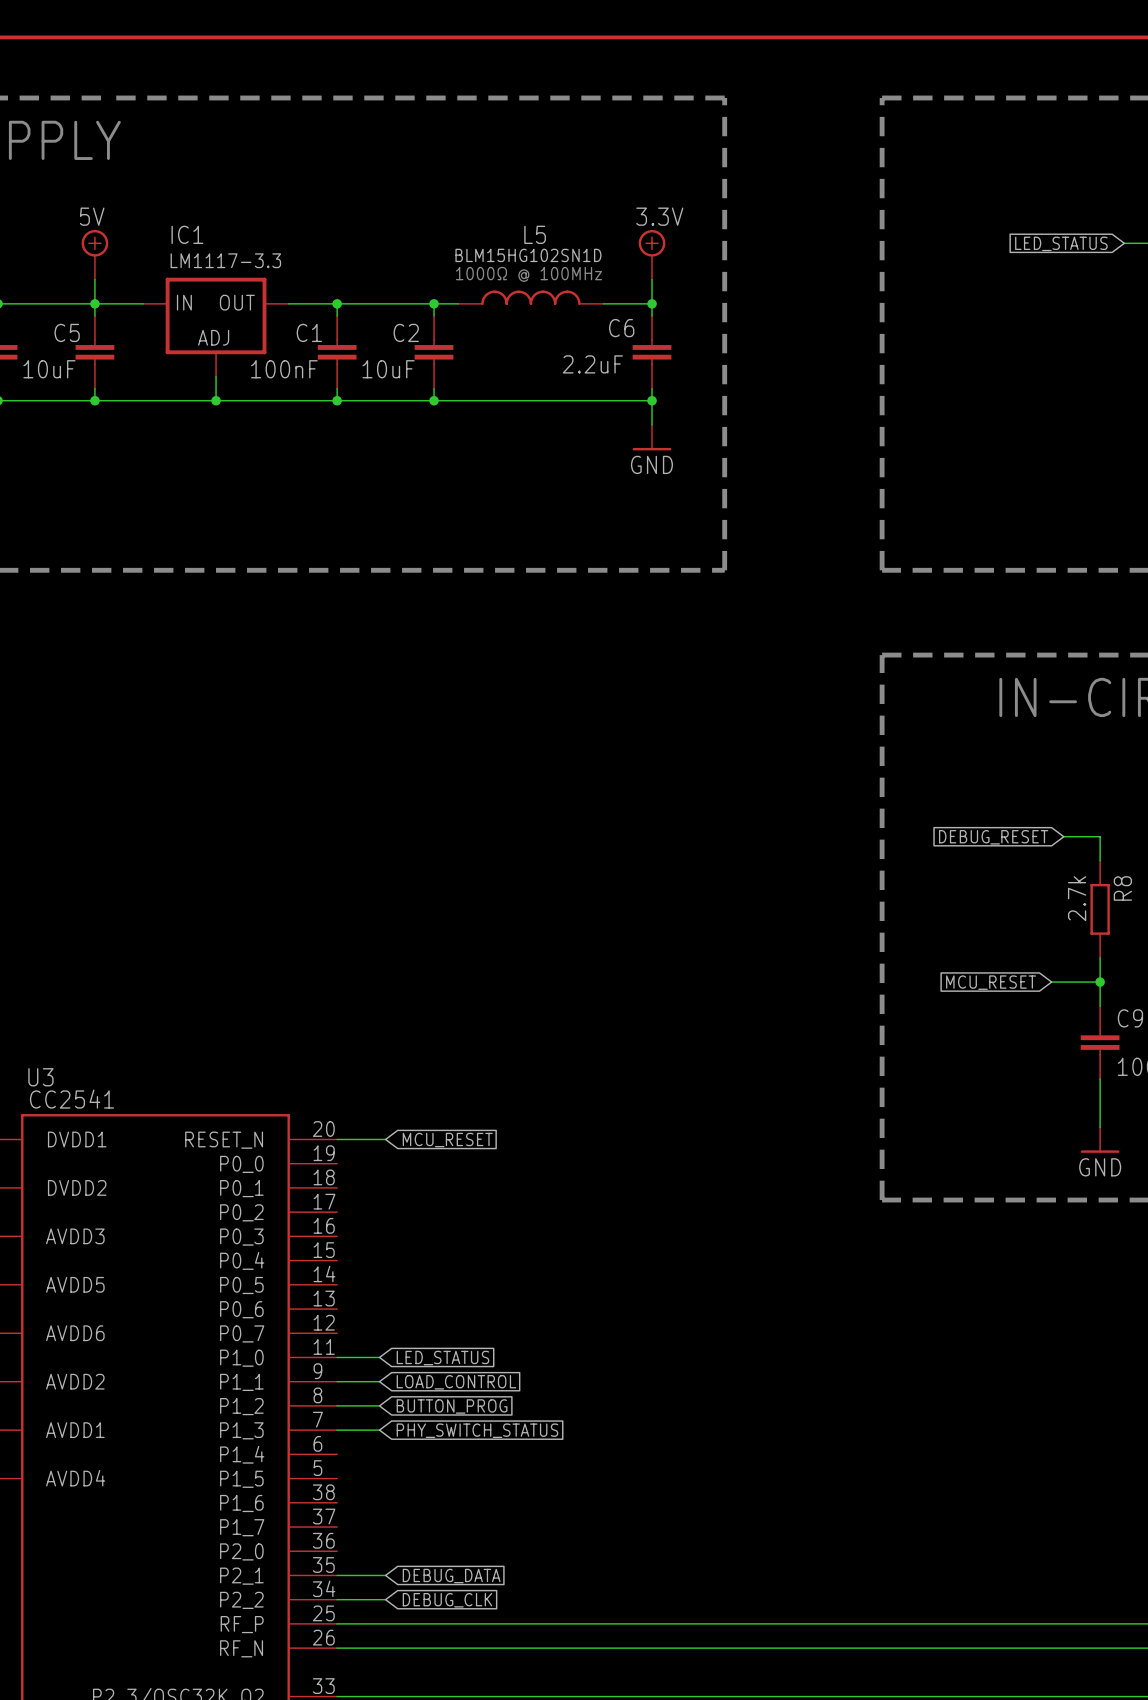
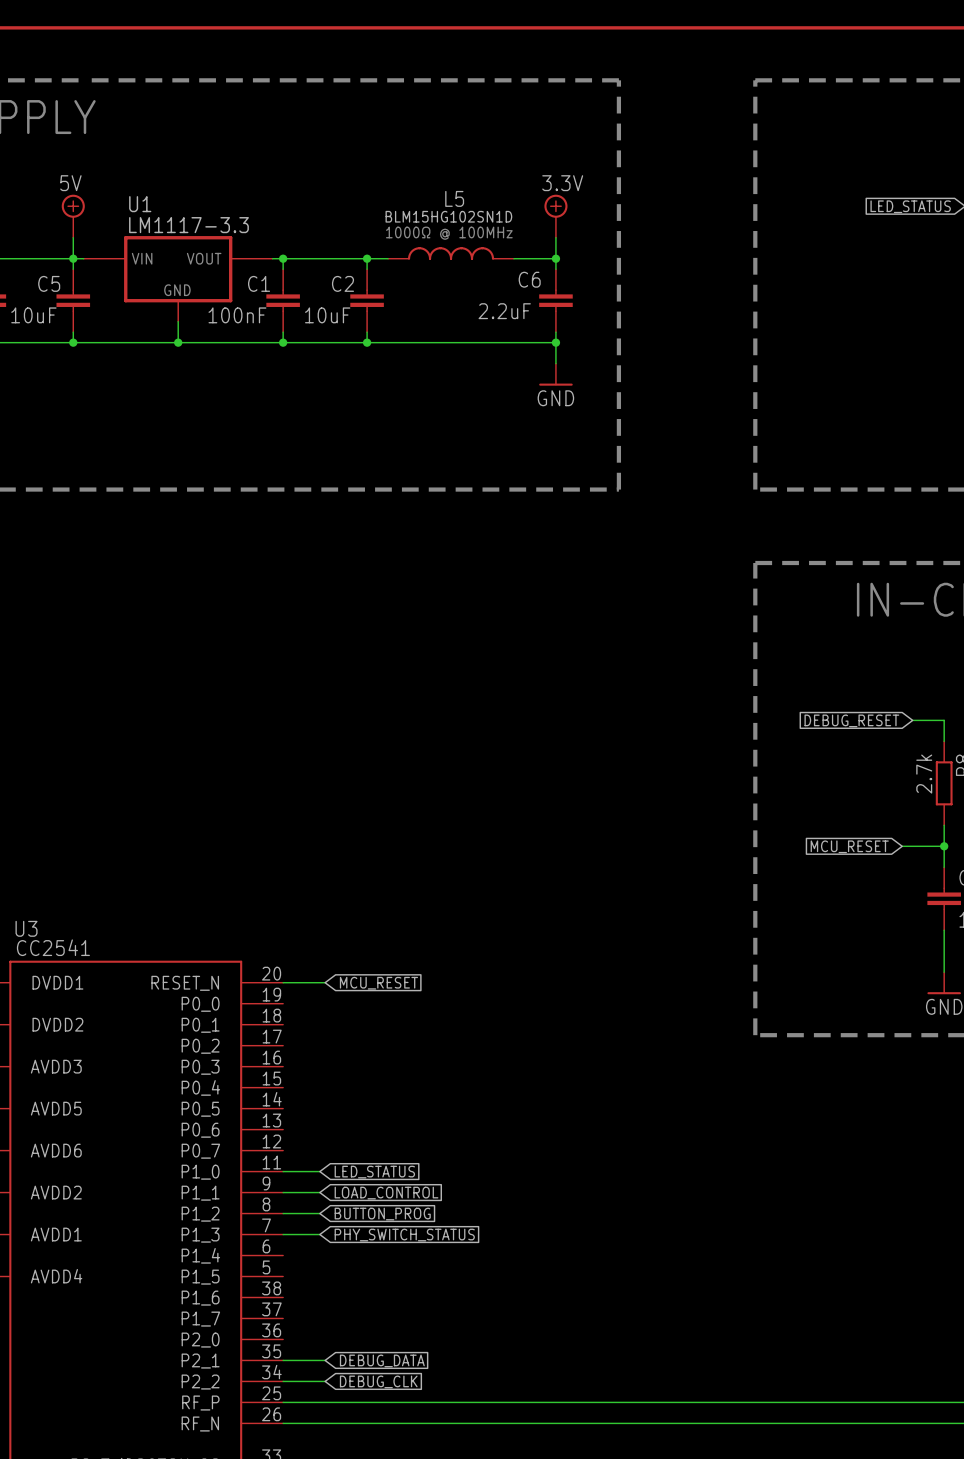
IC1: LM1117-3.3 (216, 327) -> none
U1: none -> LM1117-3.3 (178, 278)

